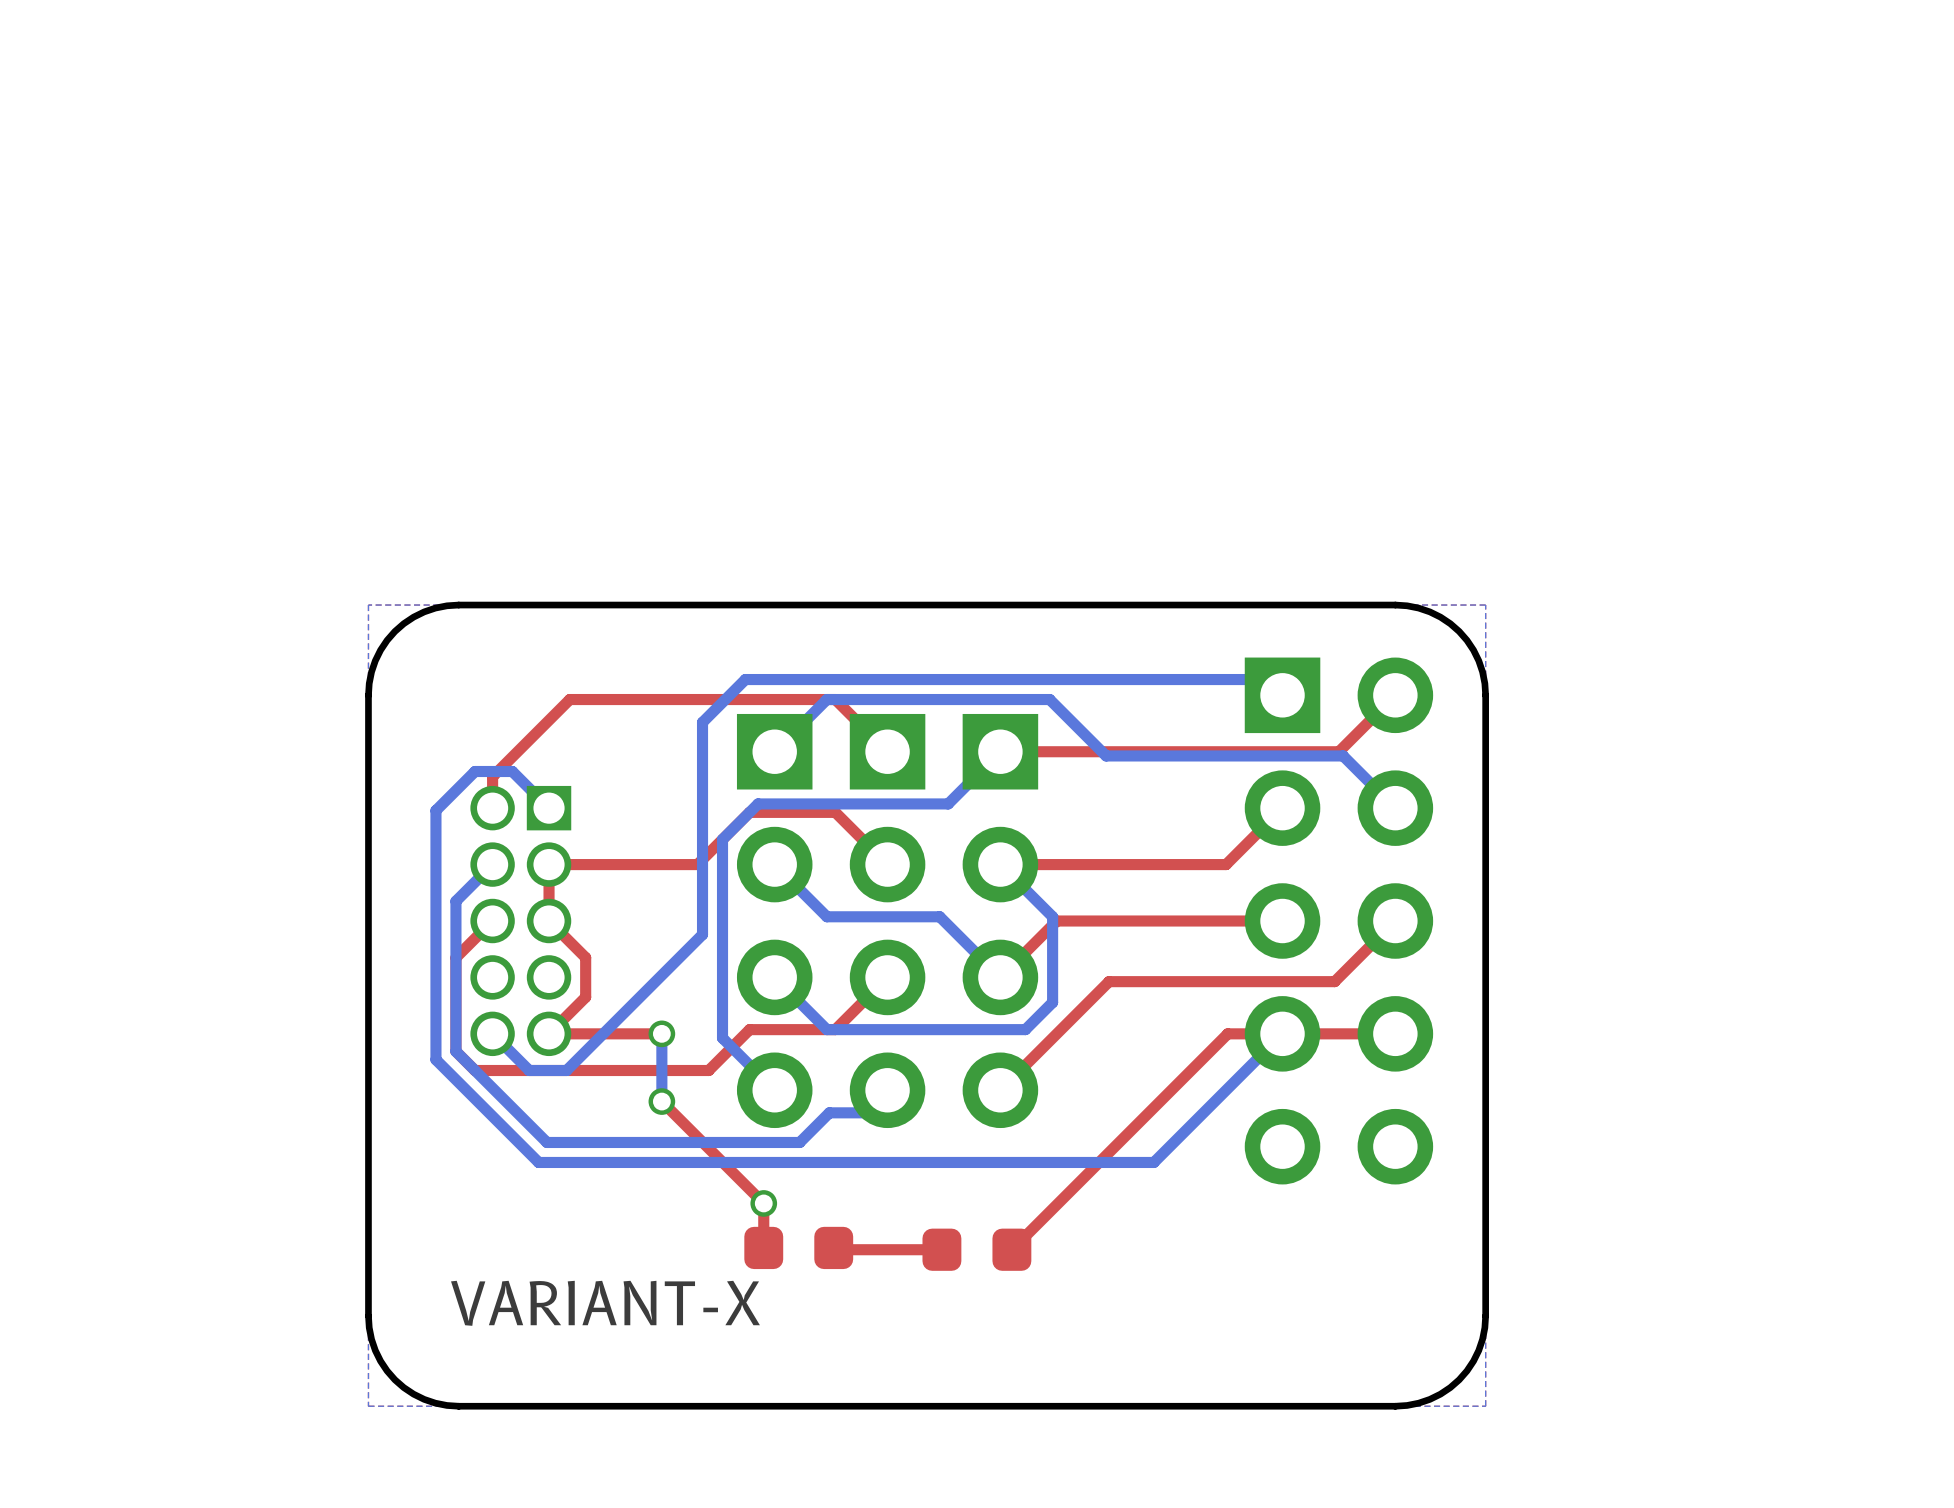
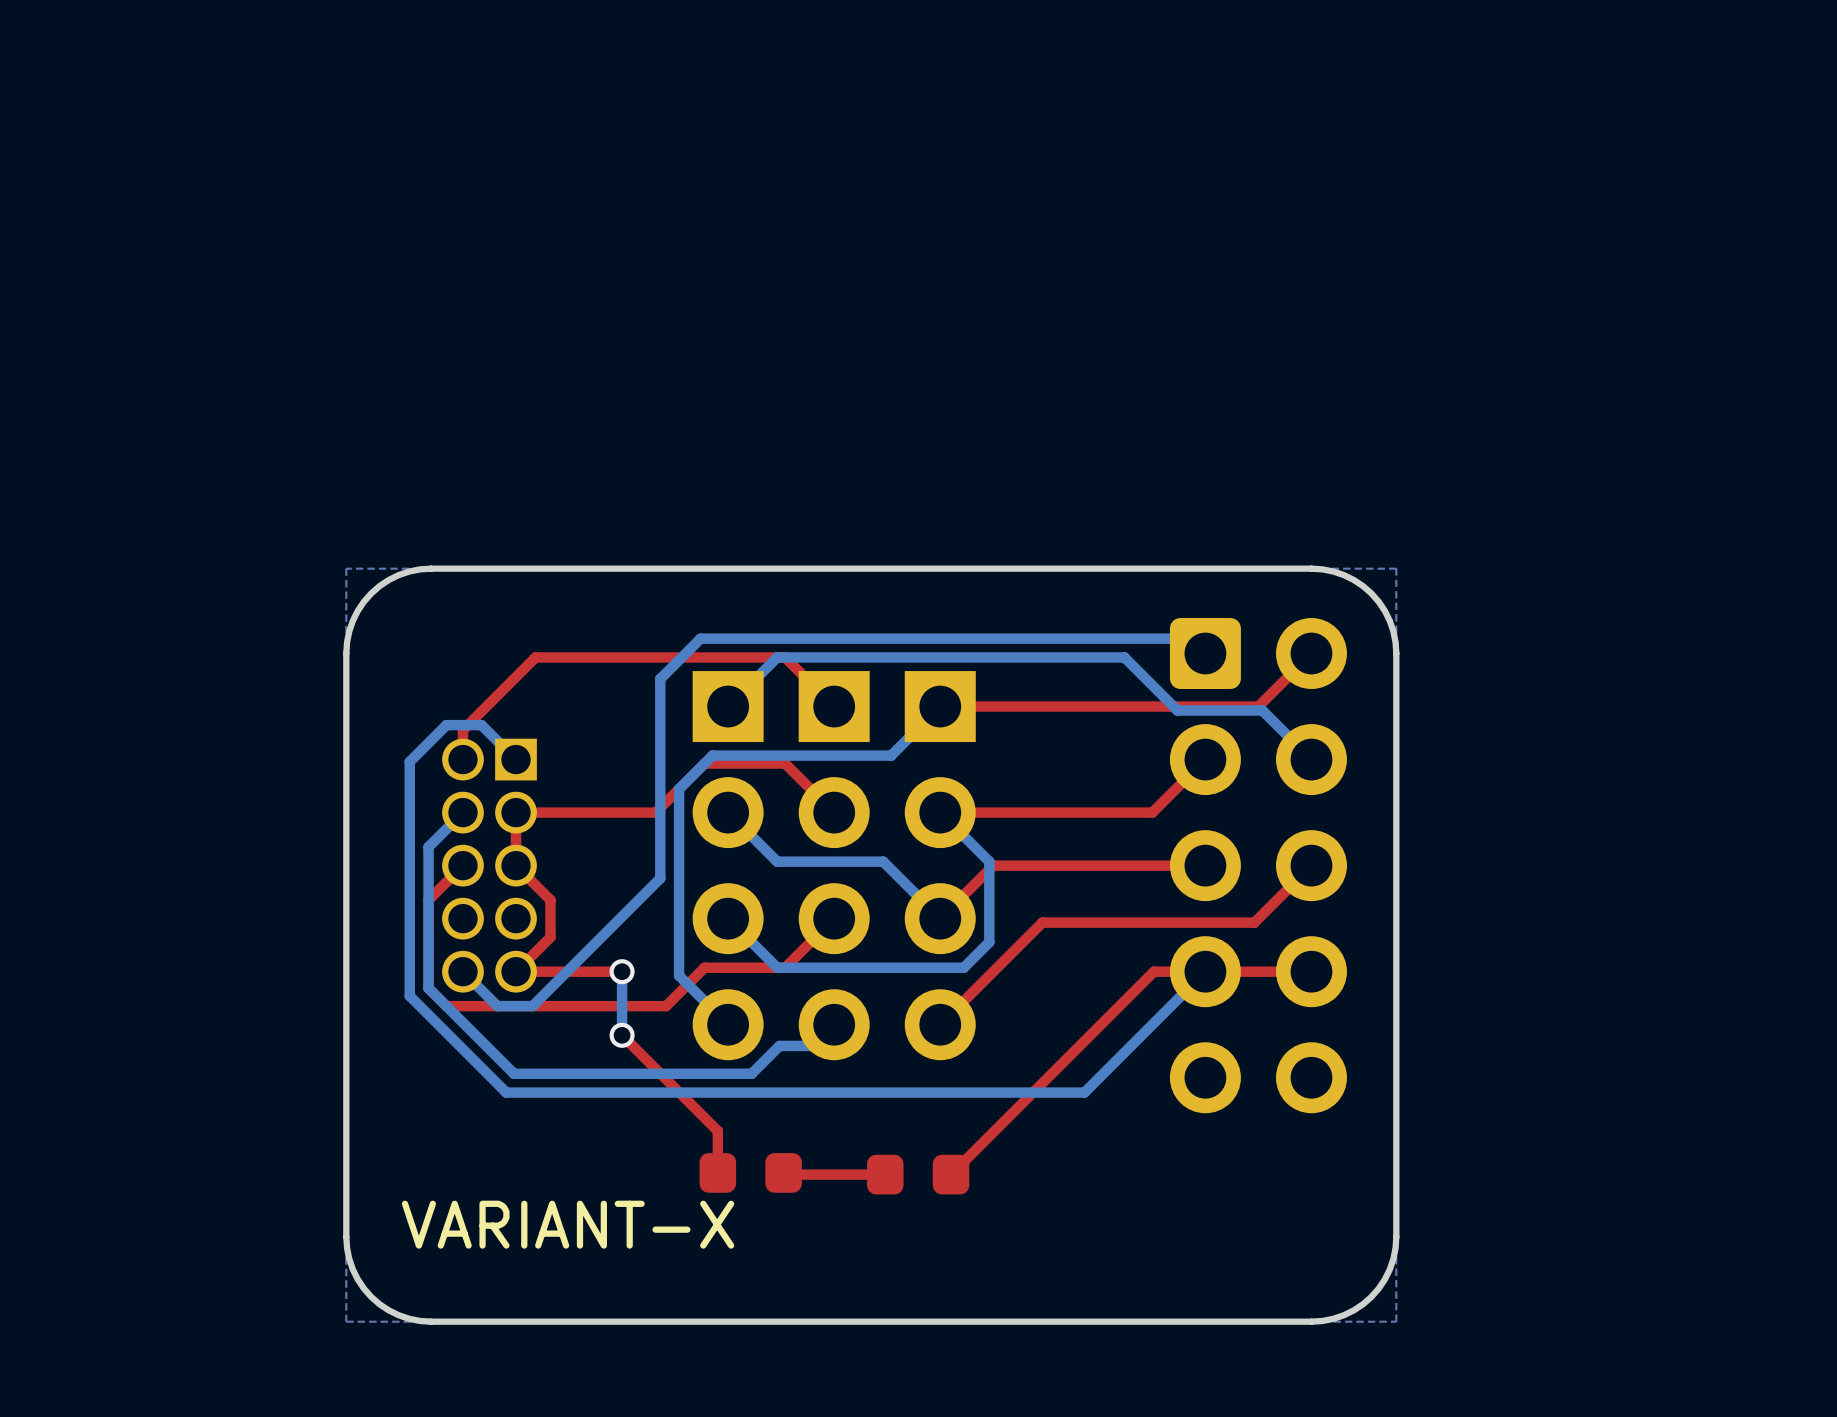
part footprint: [1244, 657, 1434, 1185] -> [1169, 618, 1347, 1114]
bottom track: (1049, 699) (1106, 755) (1252, 755) -> (986, 657) (1124, 657) (1177, 710)
via: (763, 1203) -> none

